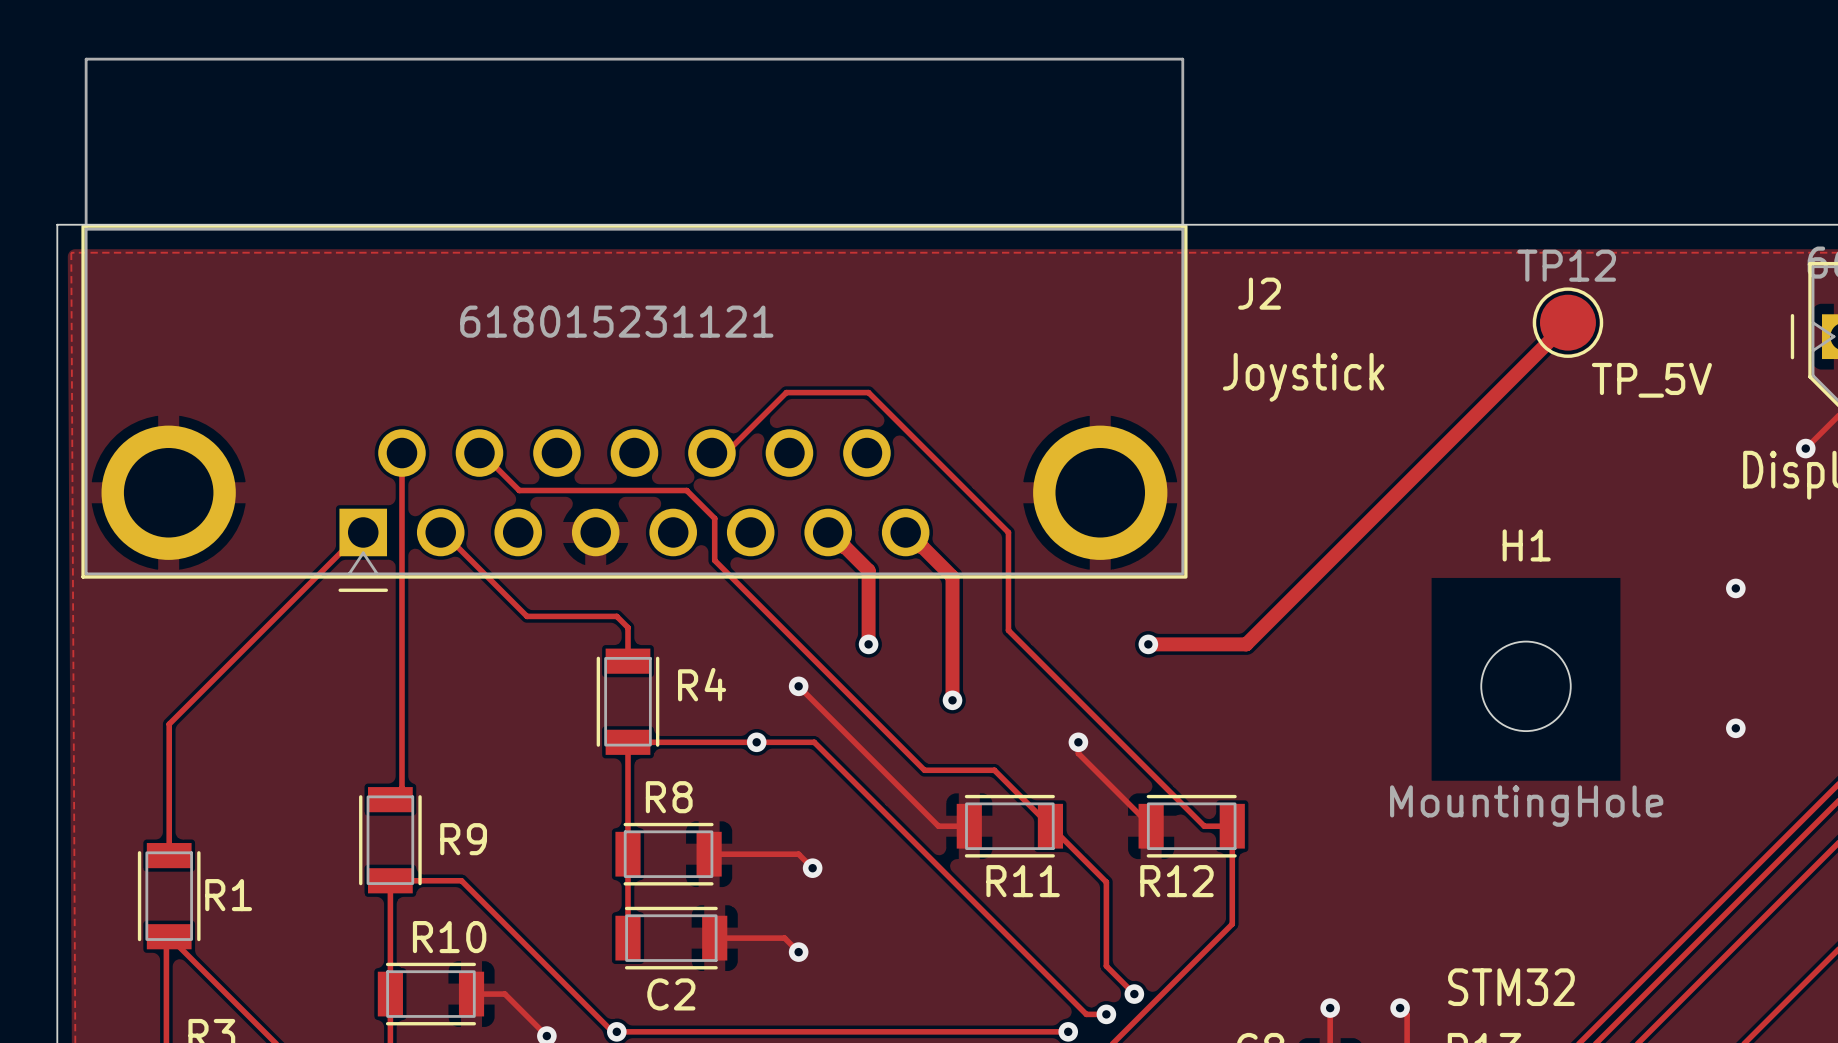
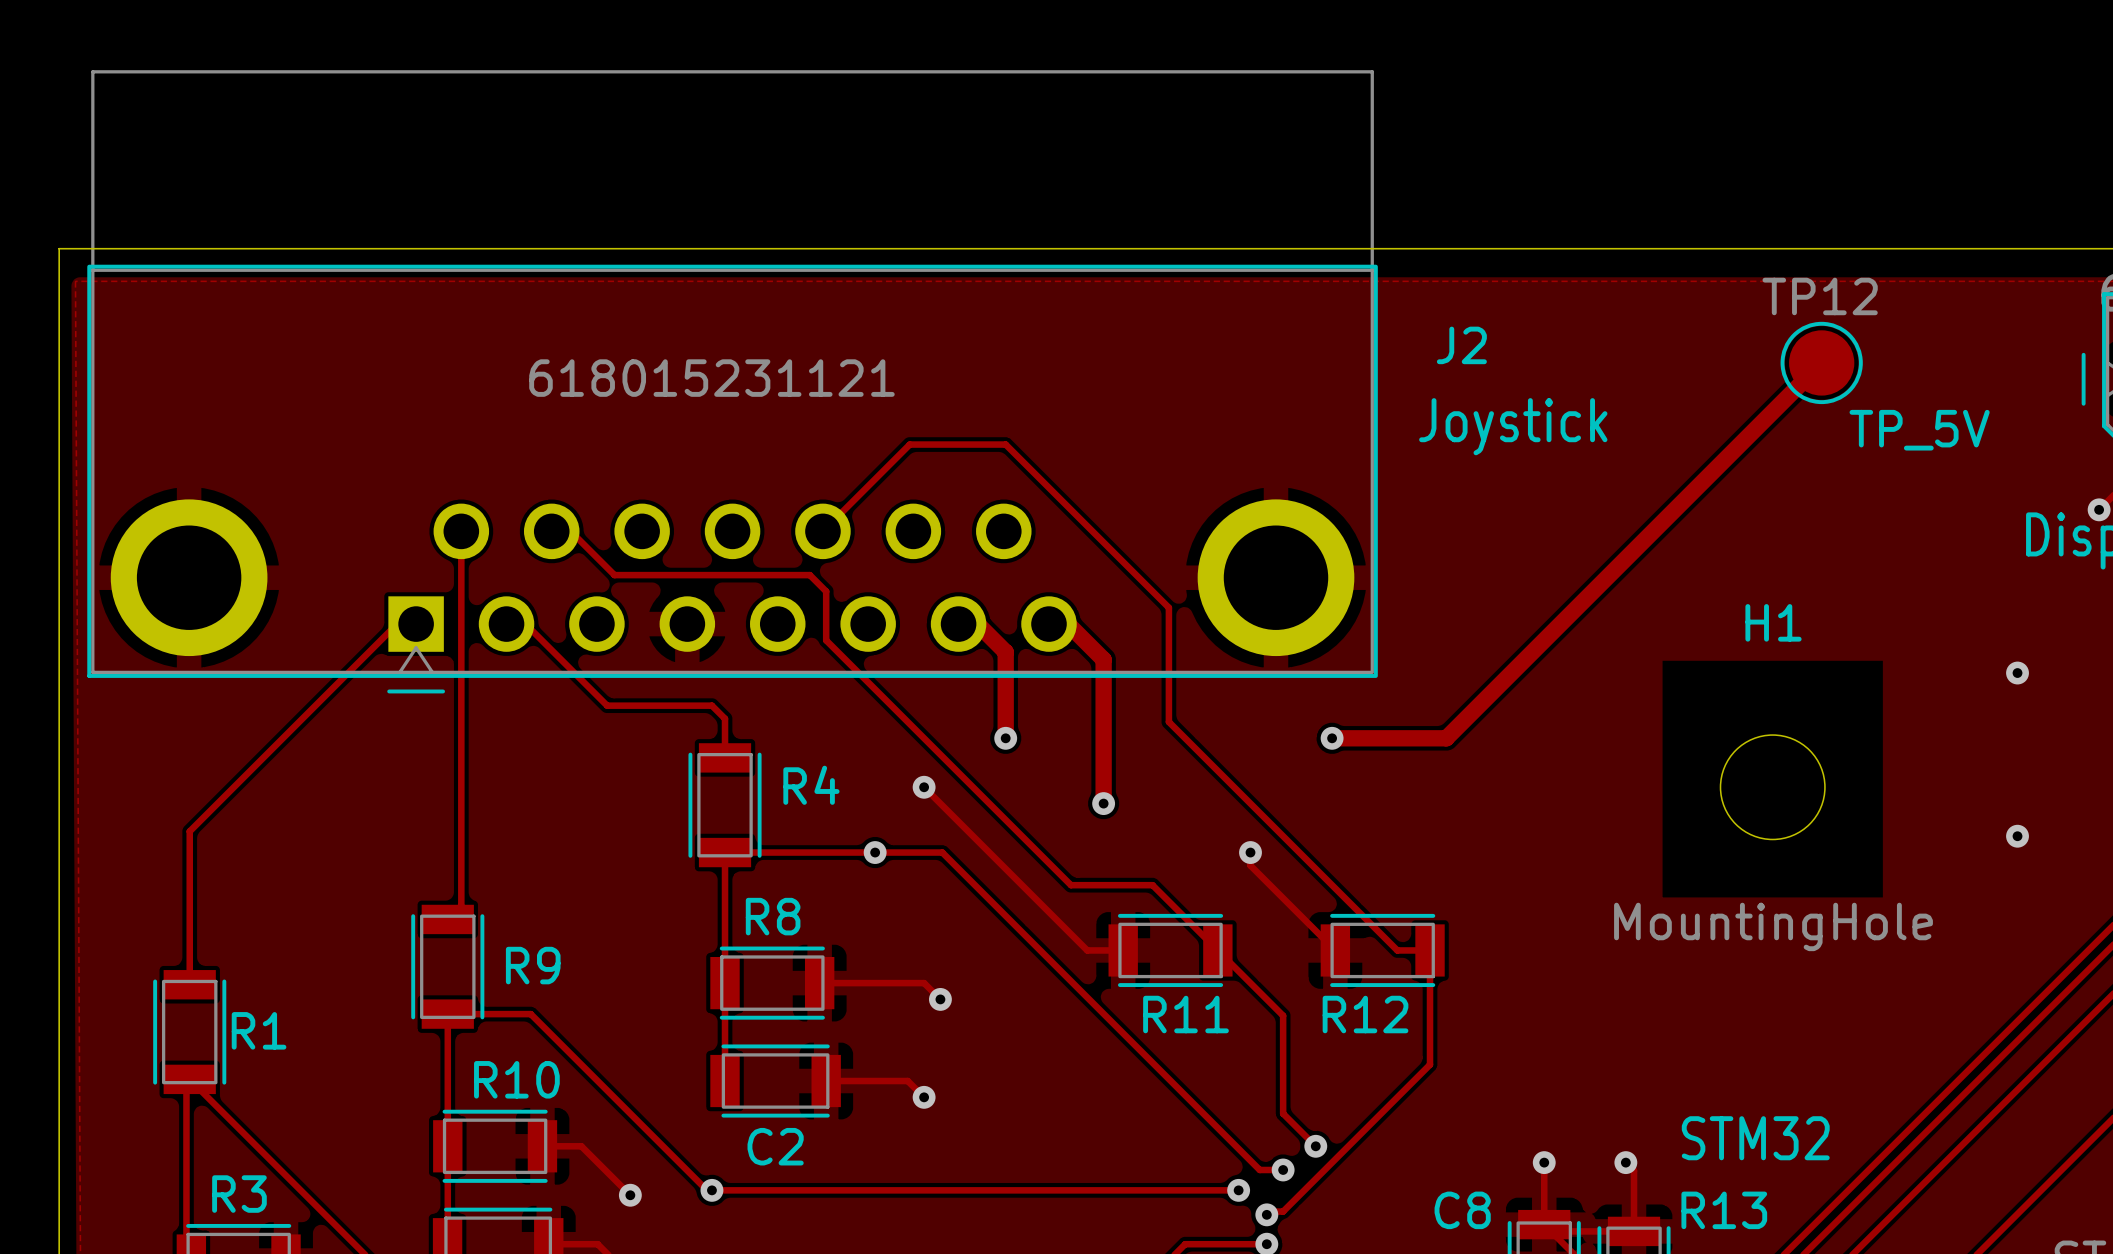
J2 position: (634, 324) -> (732, 381)
track: (519, 490) (686, 490) (700, 504) -> (598, 558) (614, 575) (809, 575)

